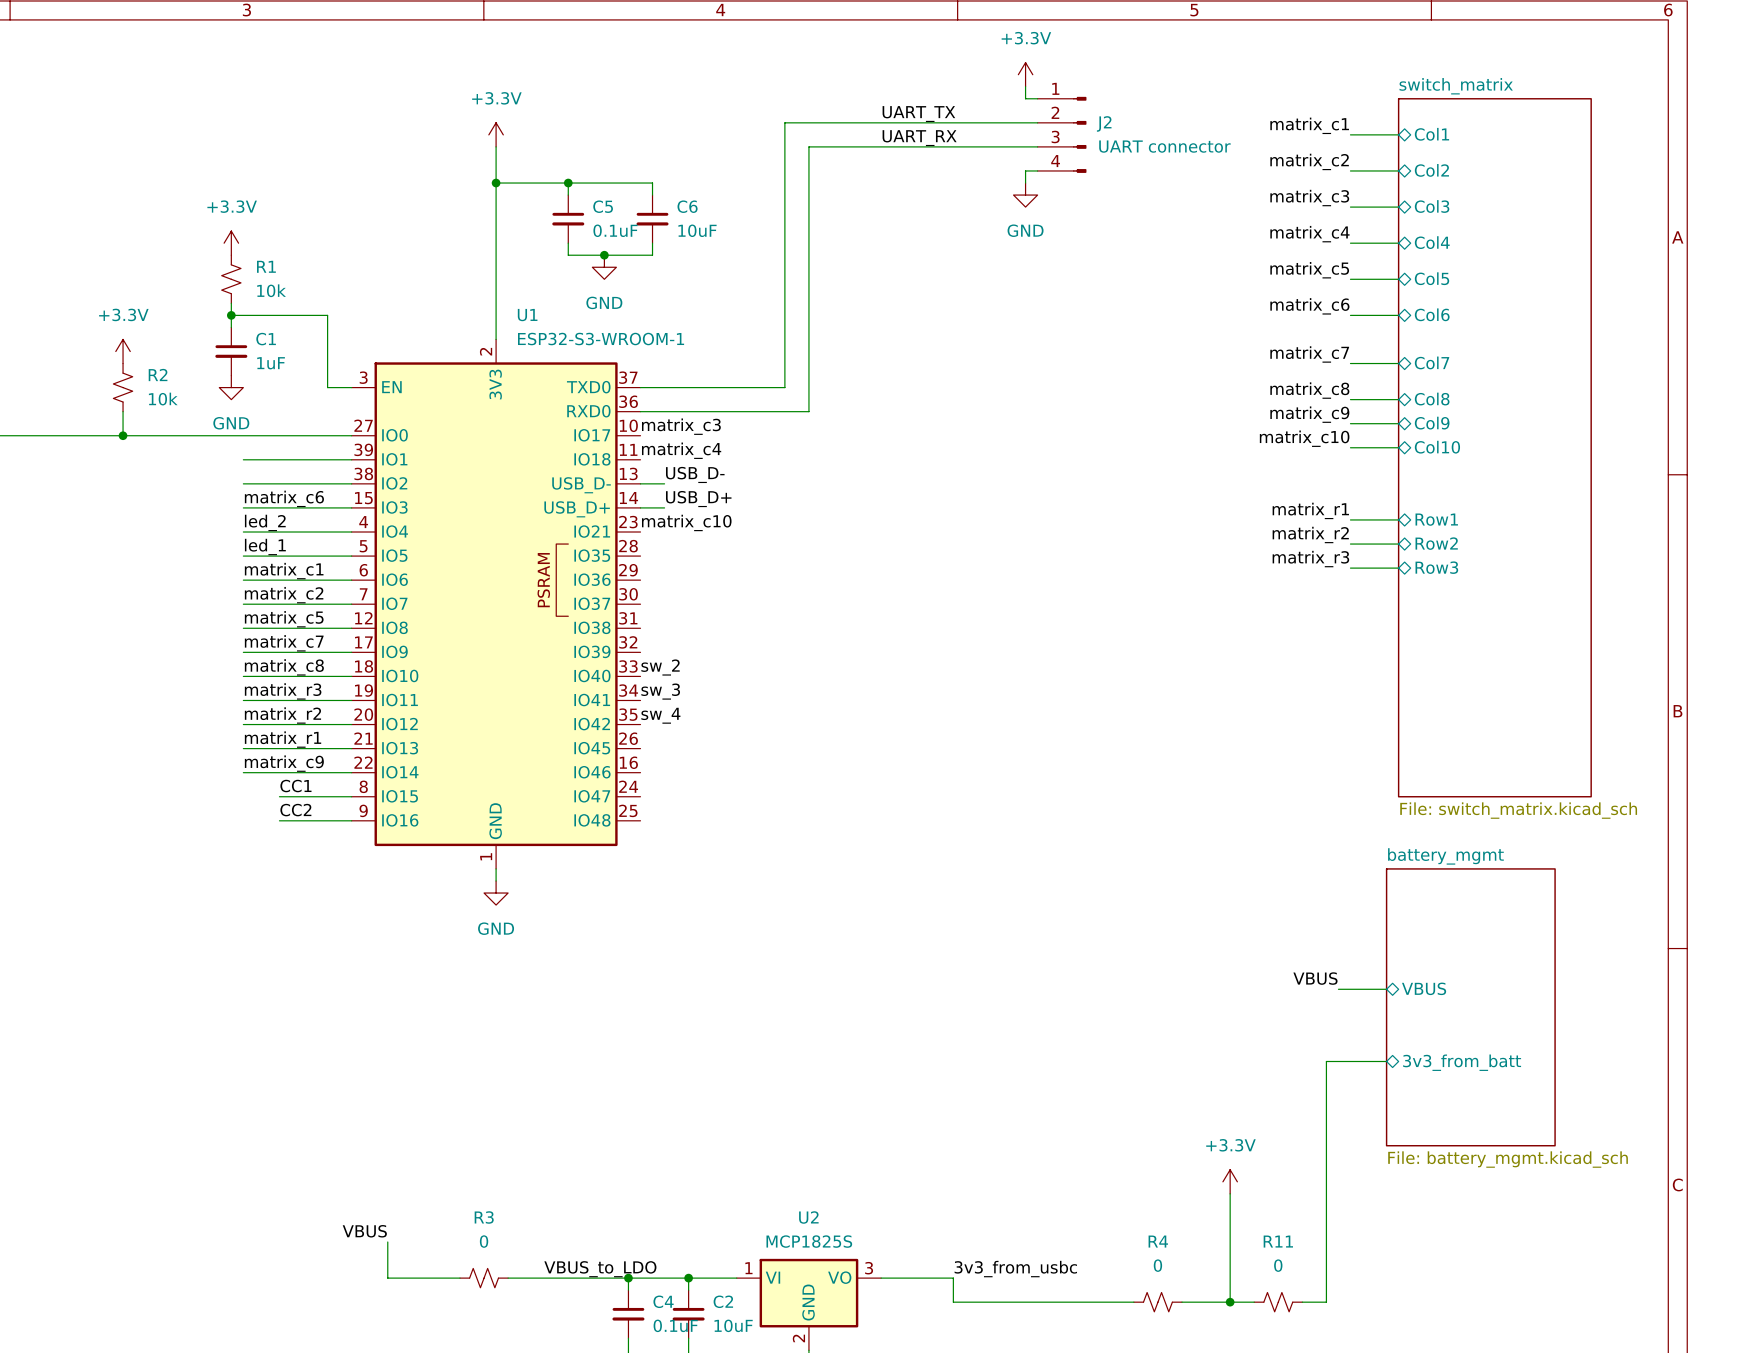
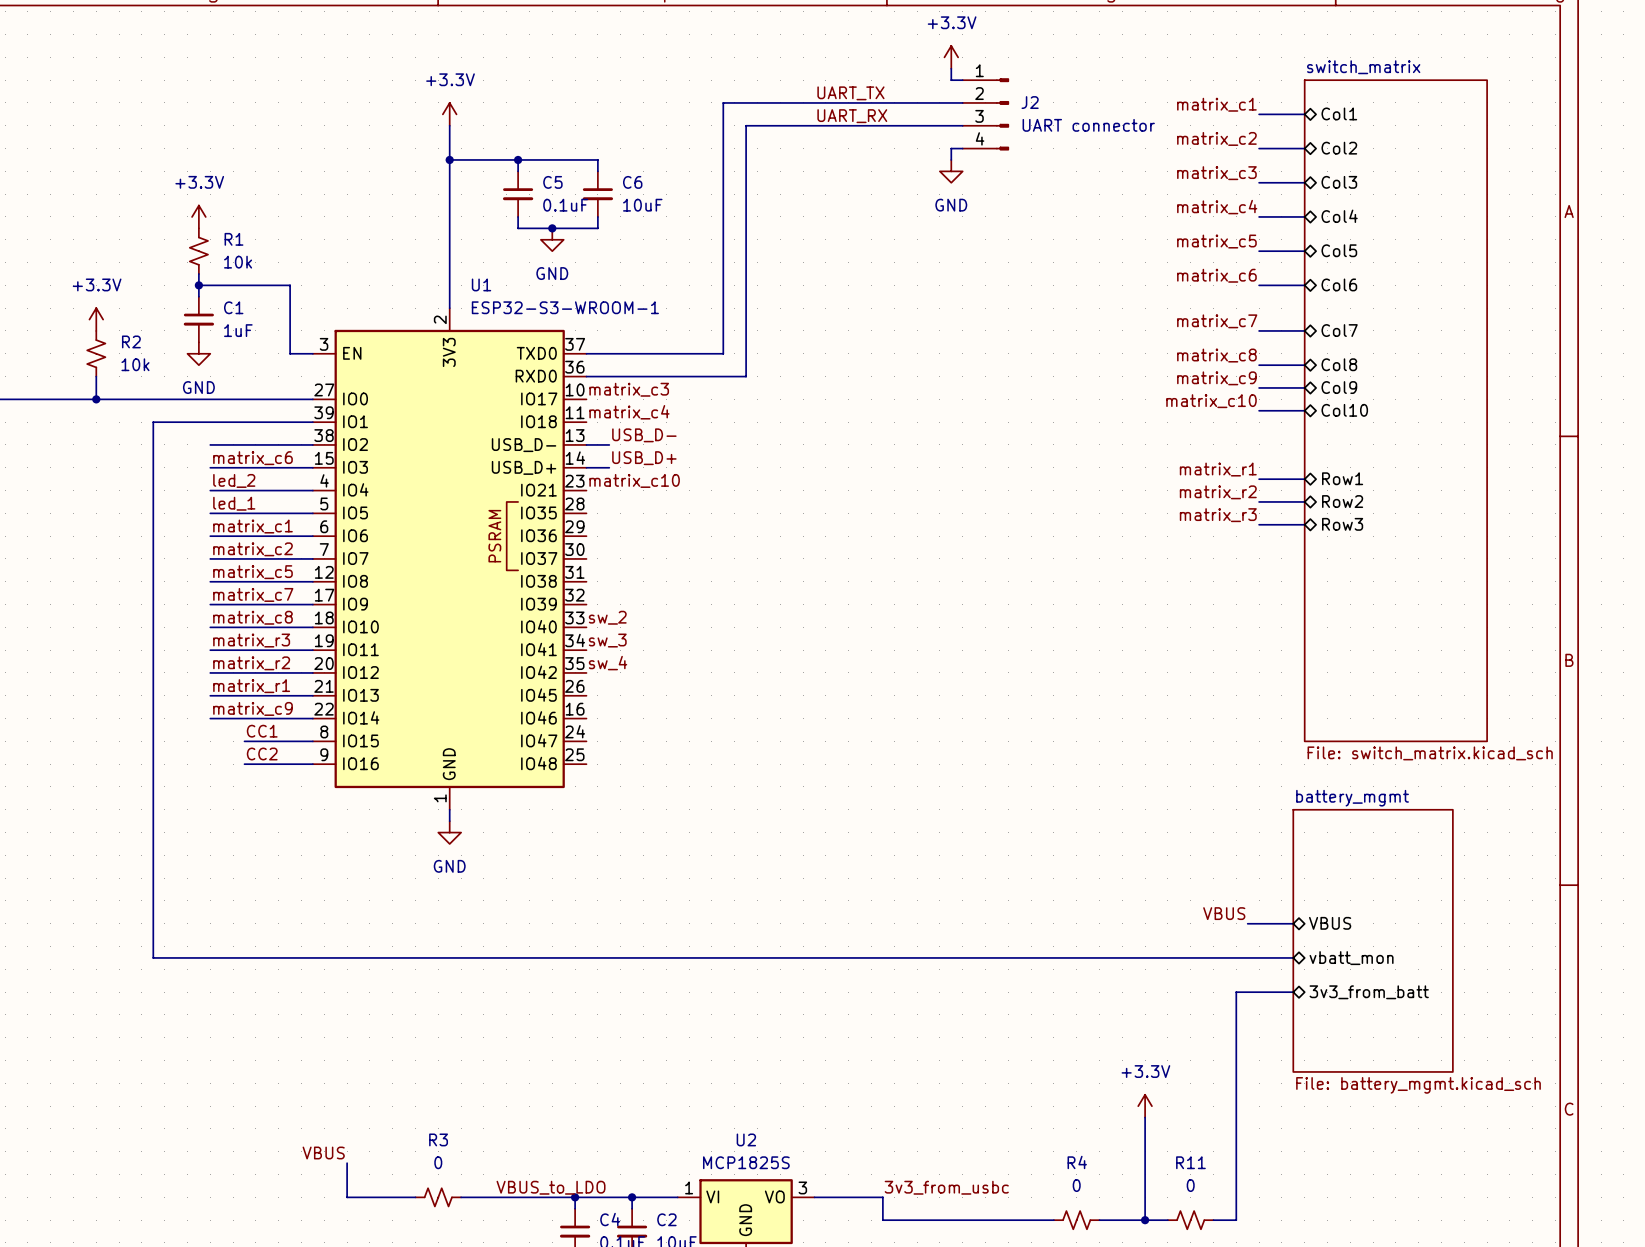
wire: none -> (210, 422) (153, 422) (153, 957) (1293, 957)
sheet pin: none -> vbatt_mon (1351, 958)

